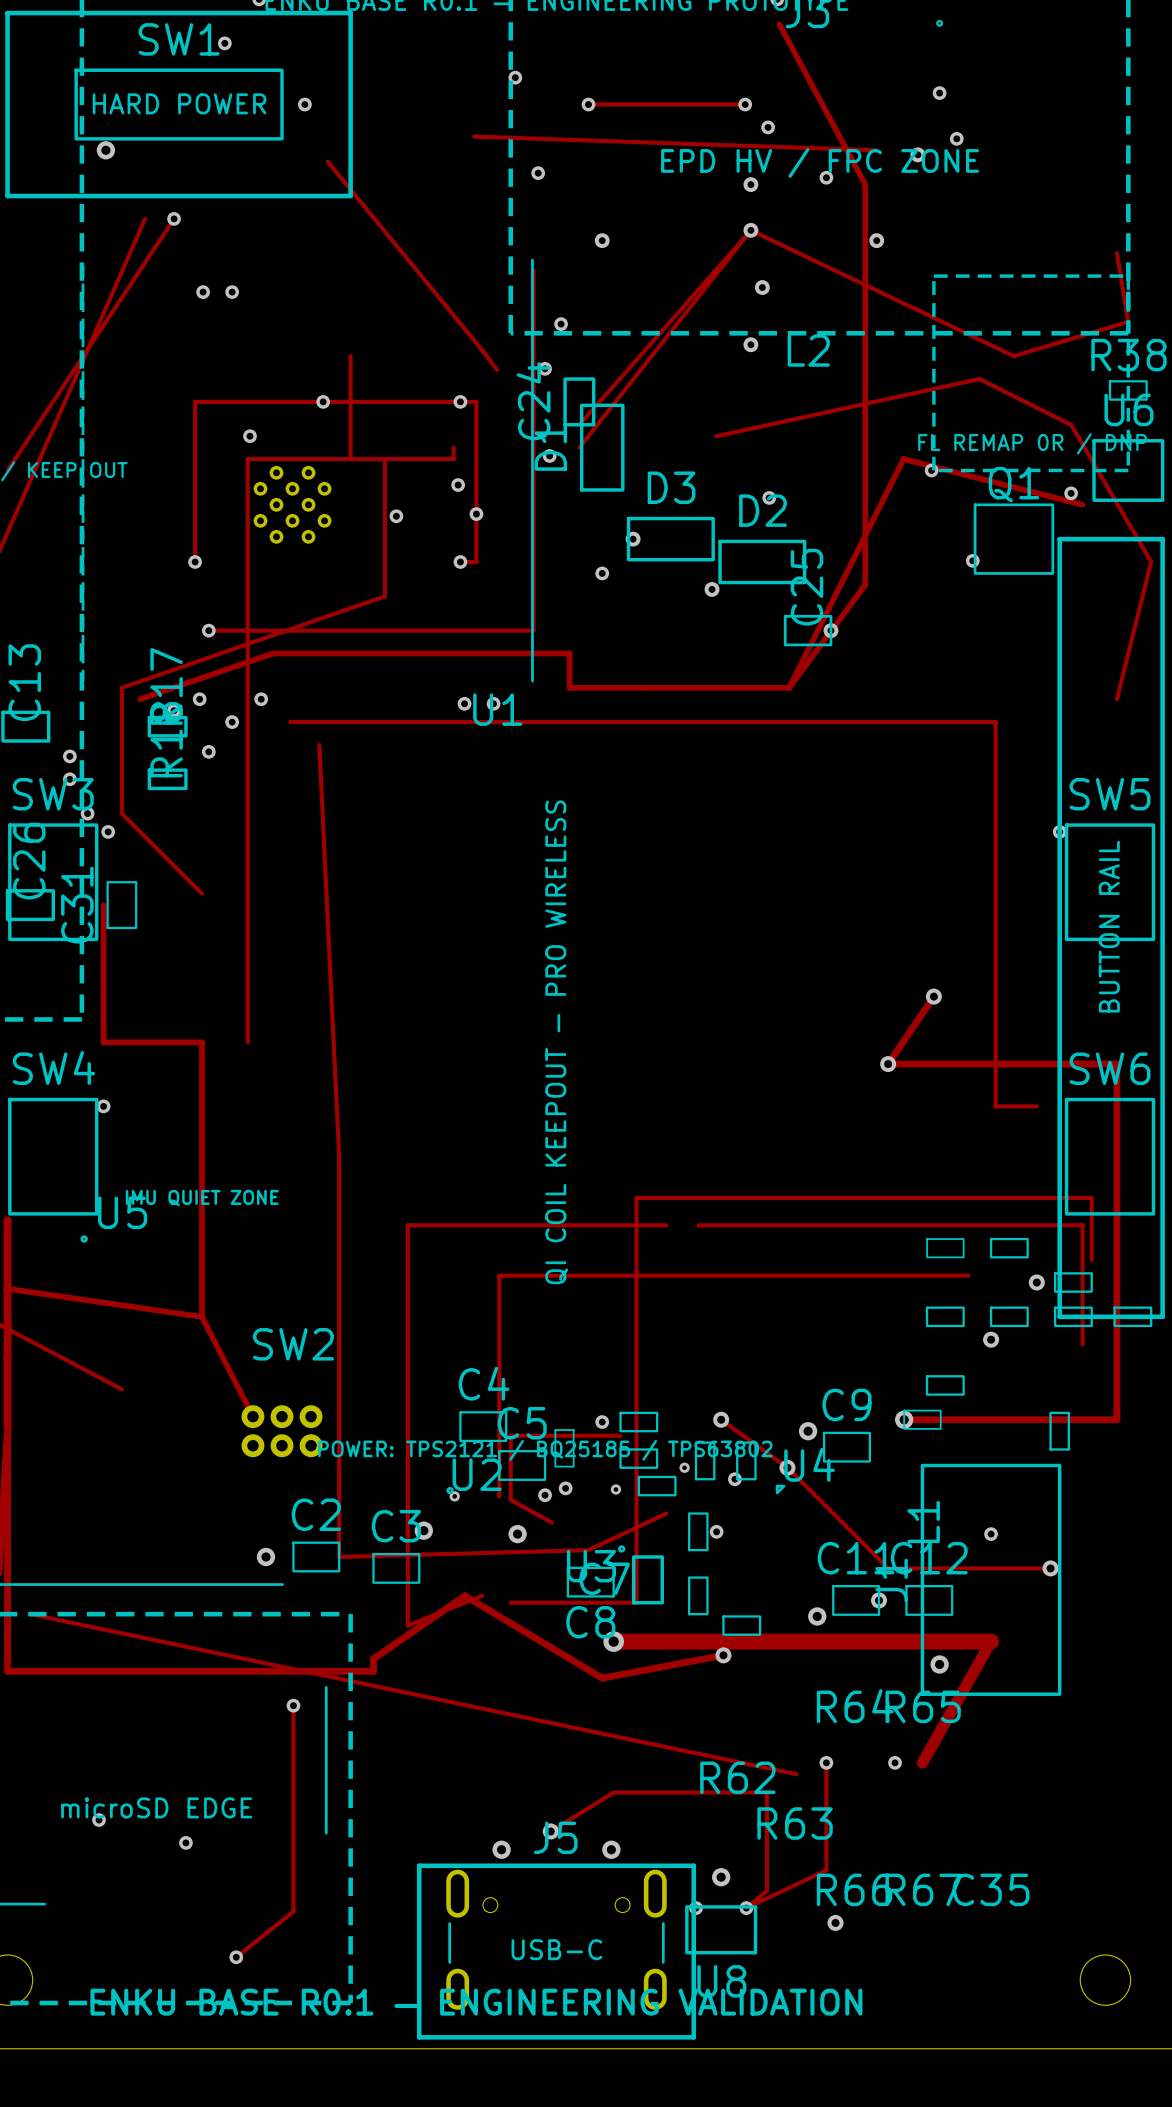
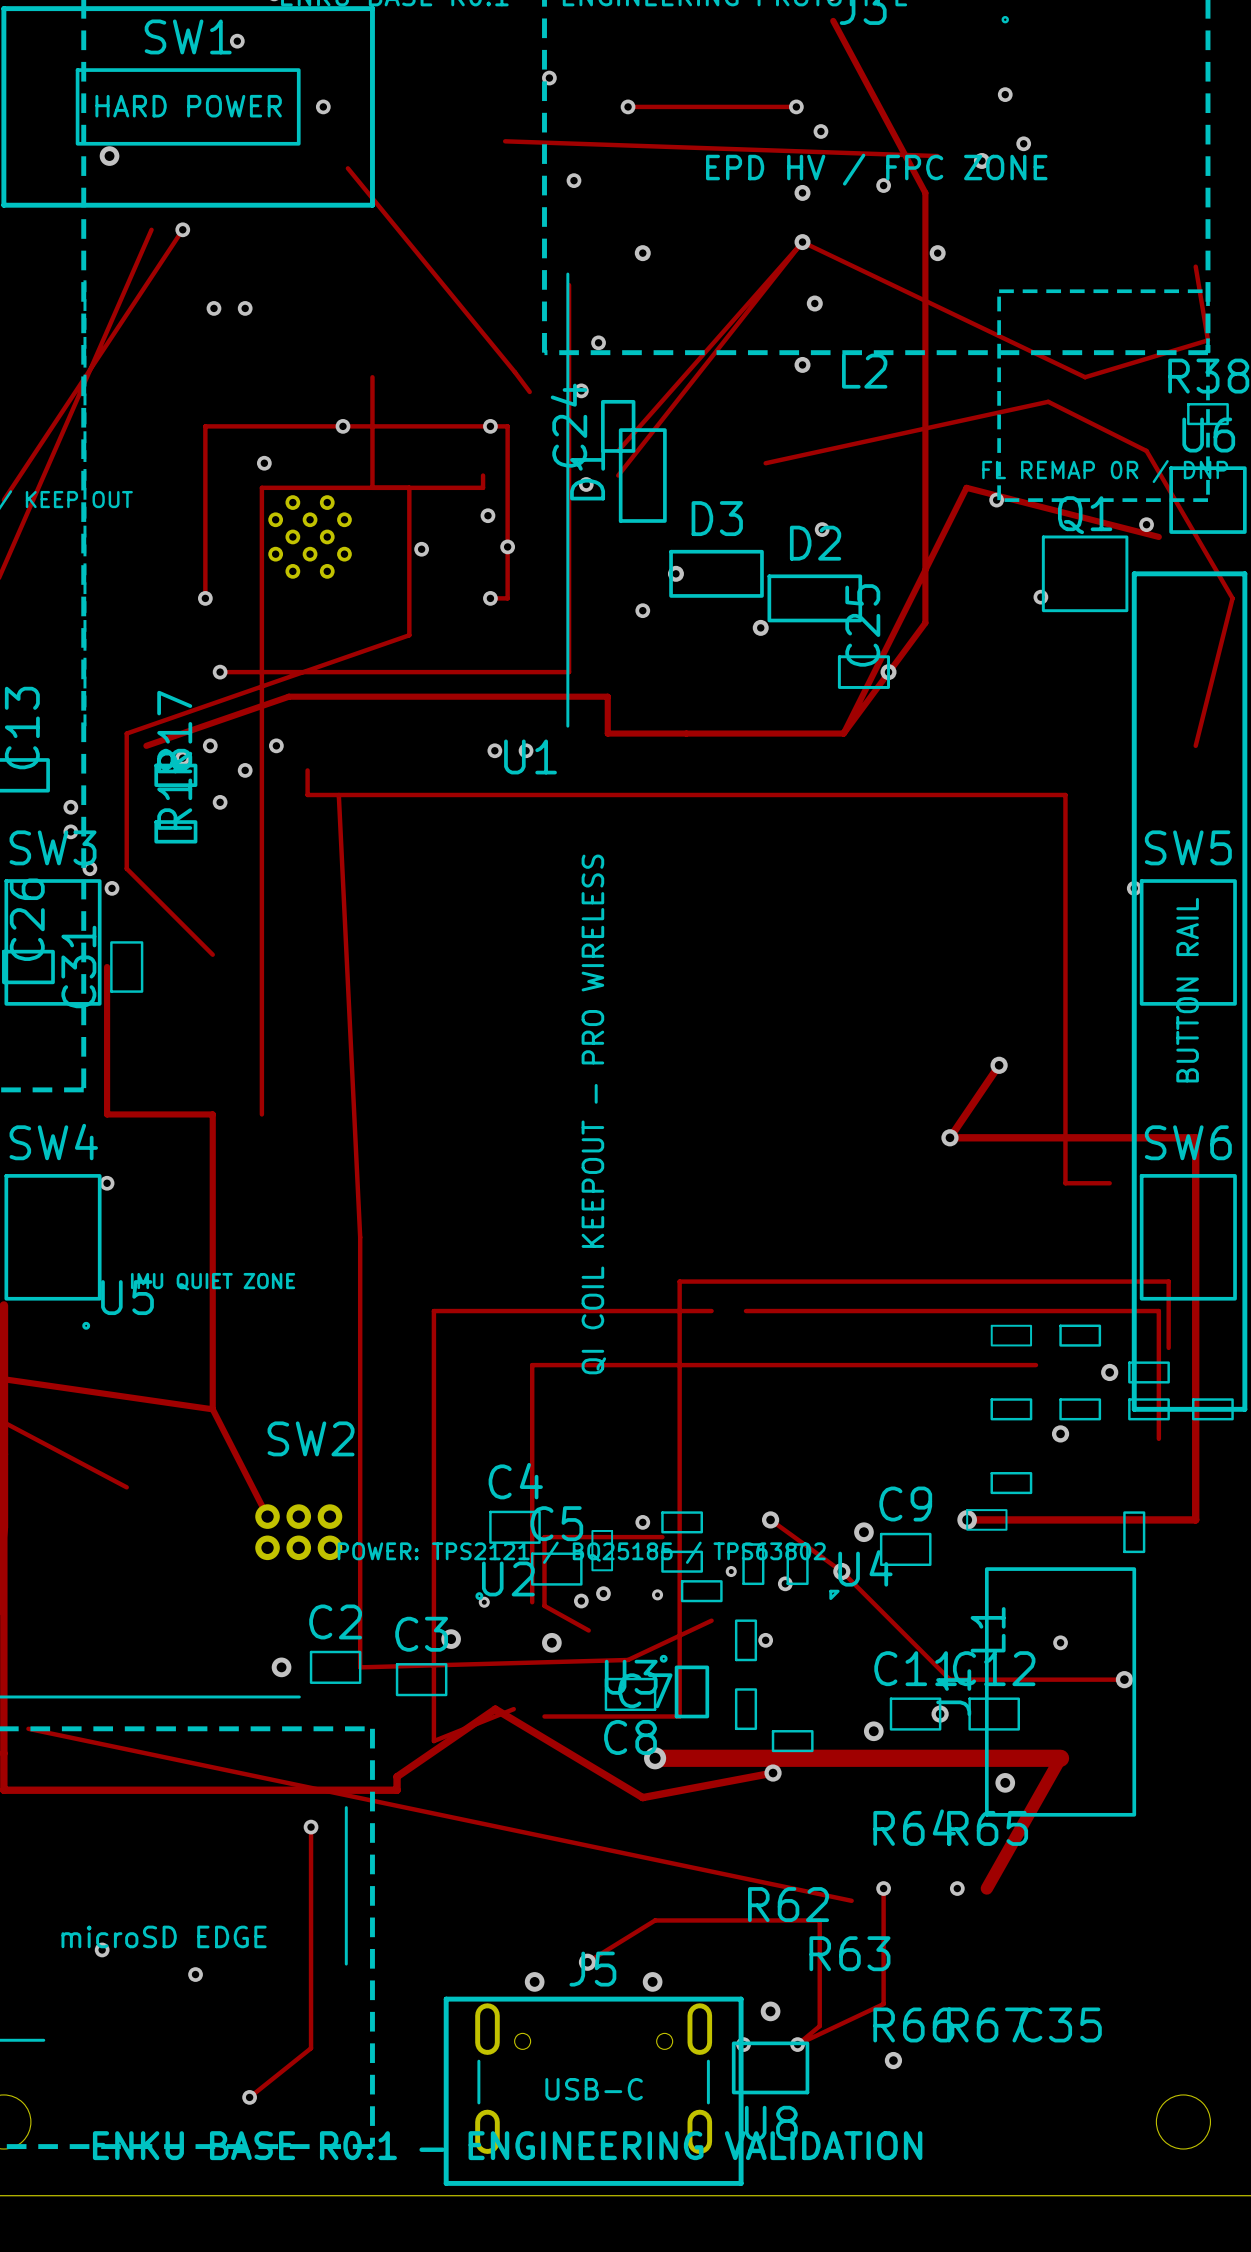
track: (290, 722) (995, 722) (995, 744) -> (307, 770) (307, 794) (1065, 794)

